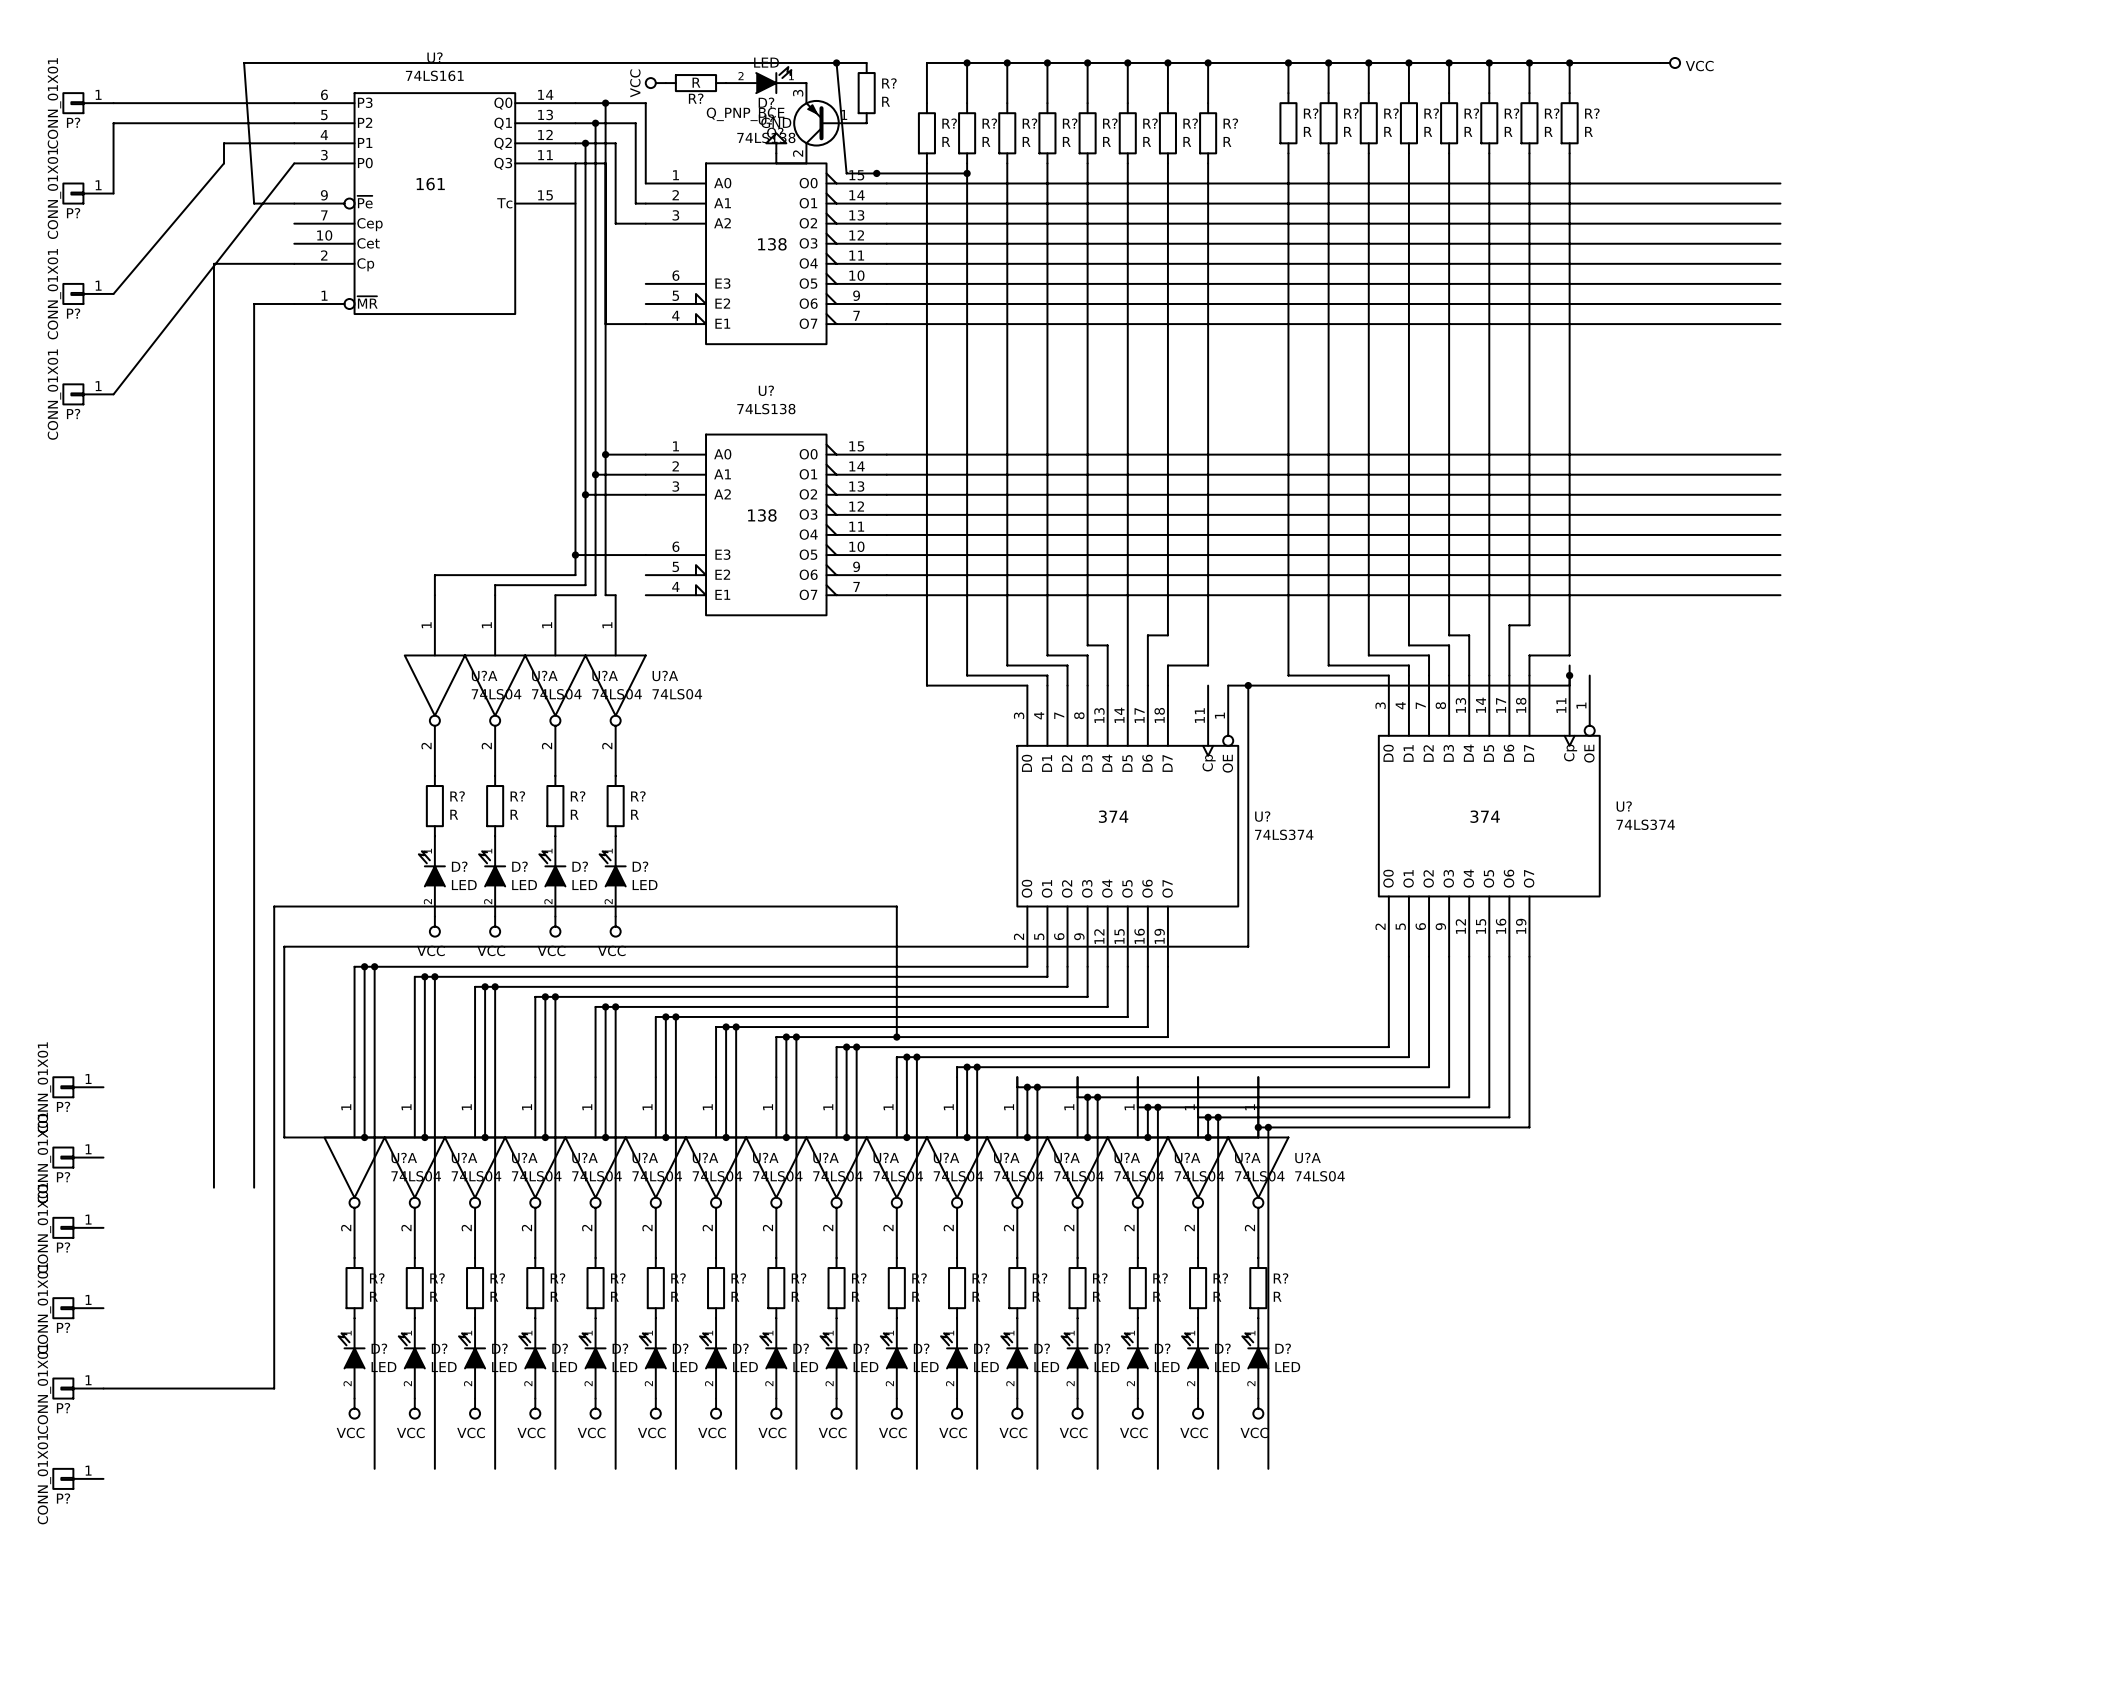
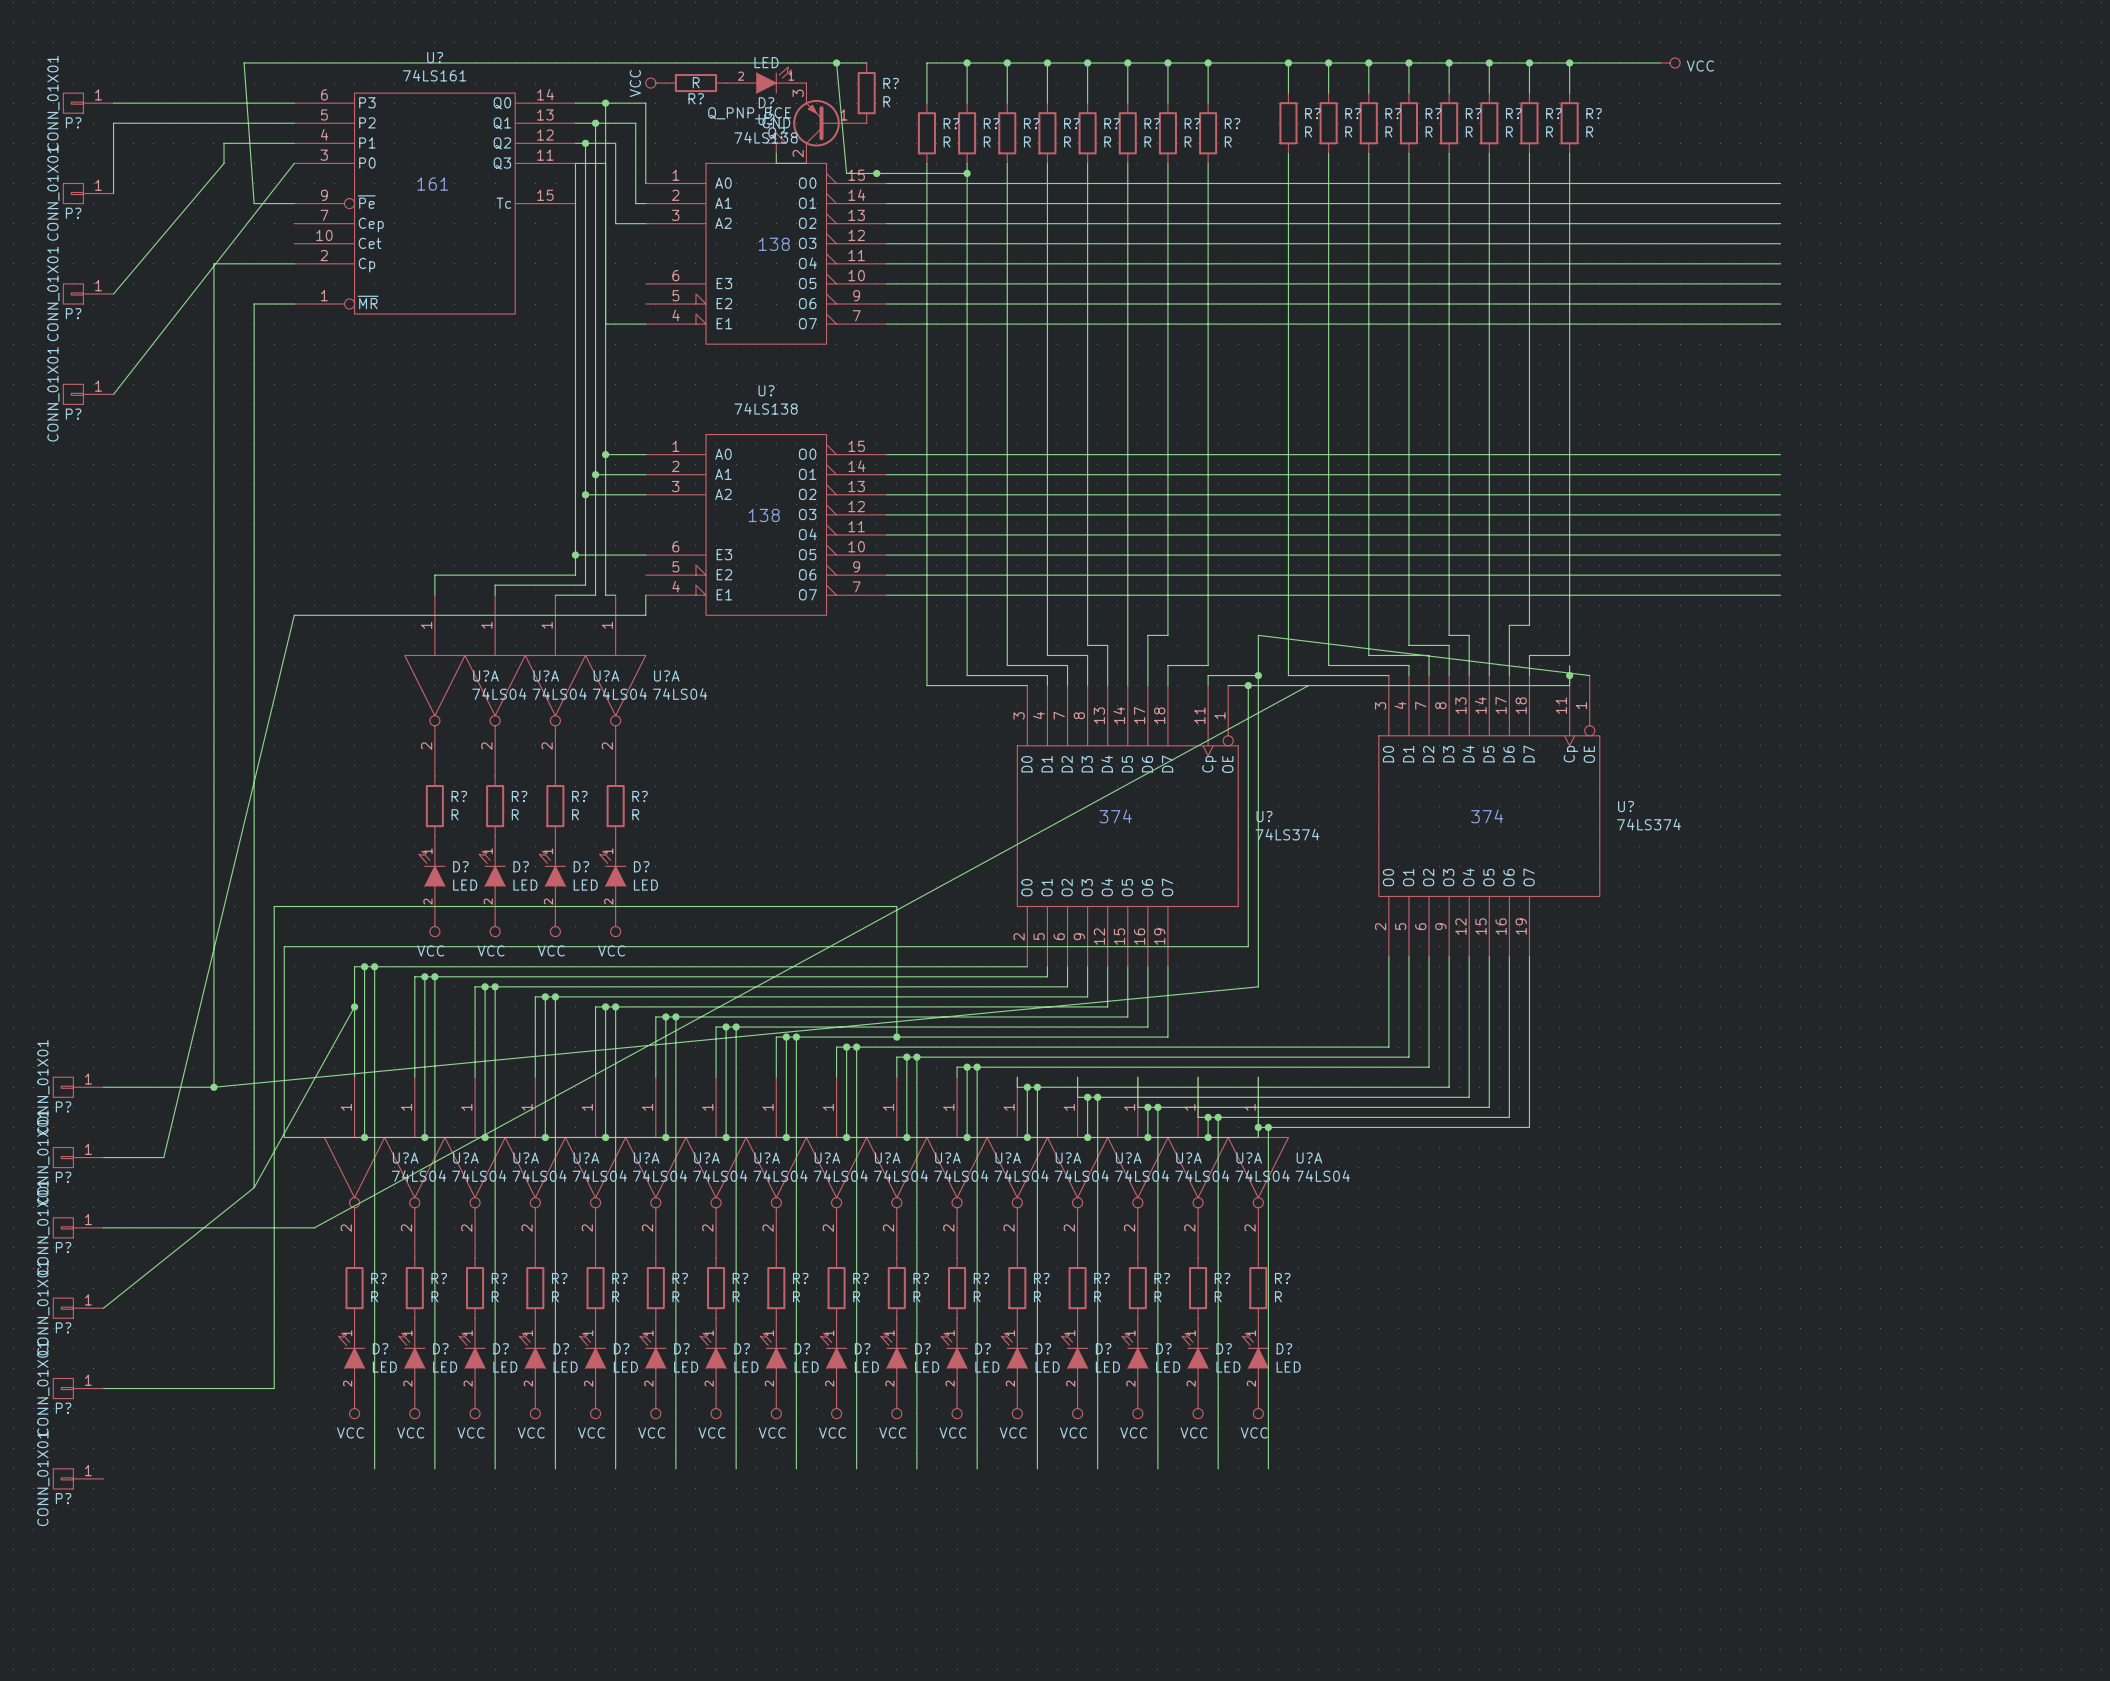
wire: none -> (645, 595) (645, 615) (294, 615) (163, 1157) (103, 1157)
wire: none -> (1258, 675) (1208, 675) (1208, 685)
junction: none -> (1258, 675)
wire: none -> (1589, 675) (1258, 635) (1258, 986) (213, 1087) (103, 1087)
wire: none -> (1308, 685) (314, 1227) (103, 1227)
wire: none -> (354, 1006) (254, 1187) (103, 1308)
junction: none -> (354, 1006)
wire: (213, 1087) (213, 1187) -> none
junction: none -> (213, 1087)

